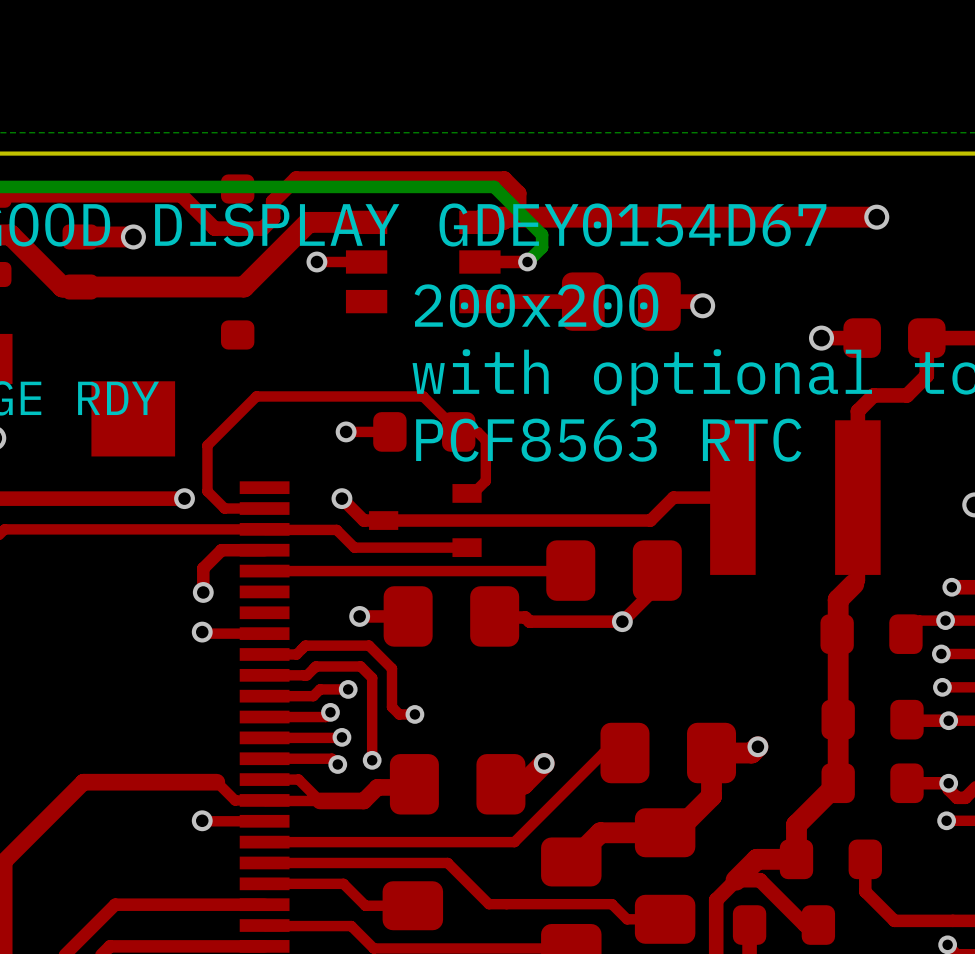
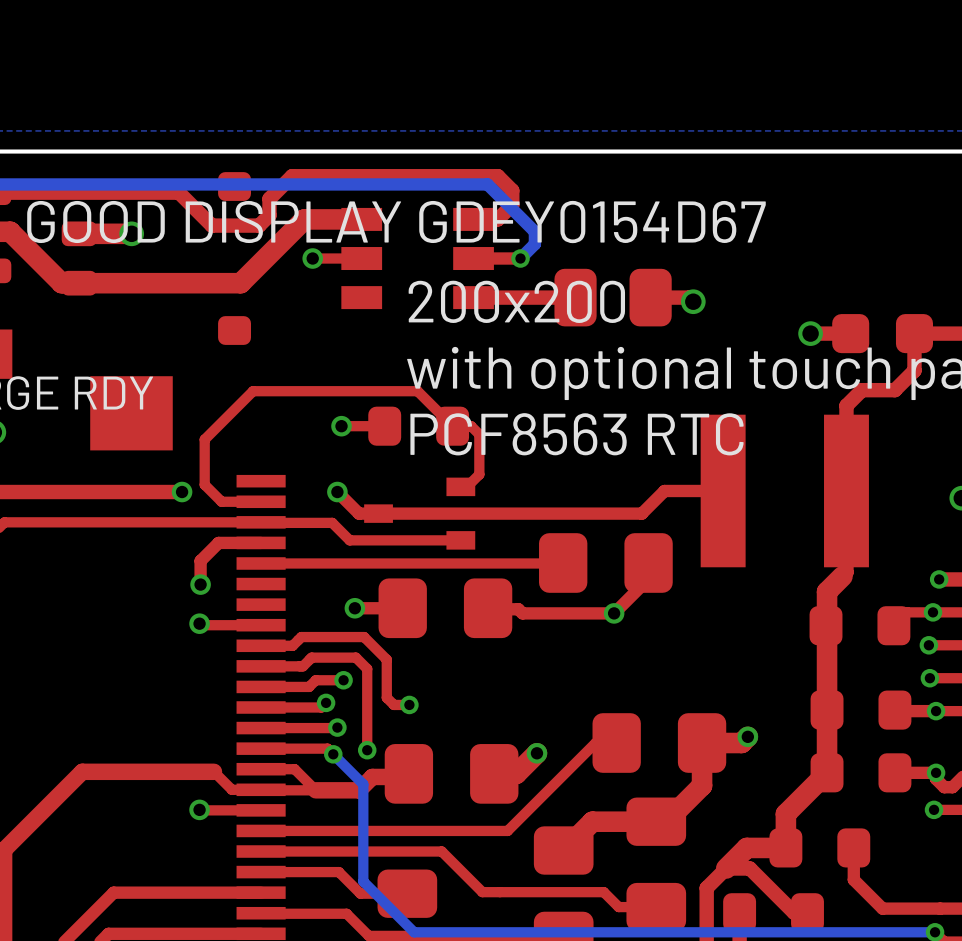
top track: (876, 217) (485, 217) (479, 222) -> none
via: (876, 217) -> none
bottom track: none -> (333, 754) (363, 784) (363, 881) (414, 932) (935, 932)

